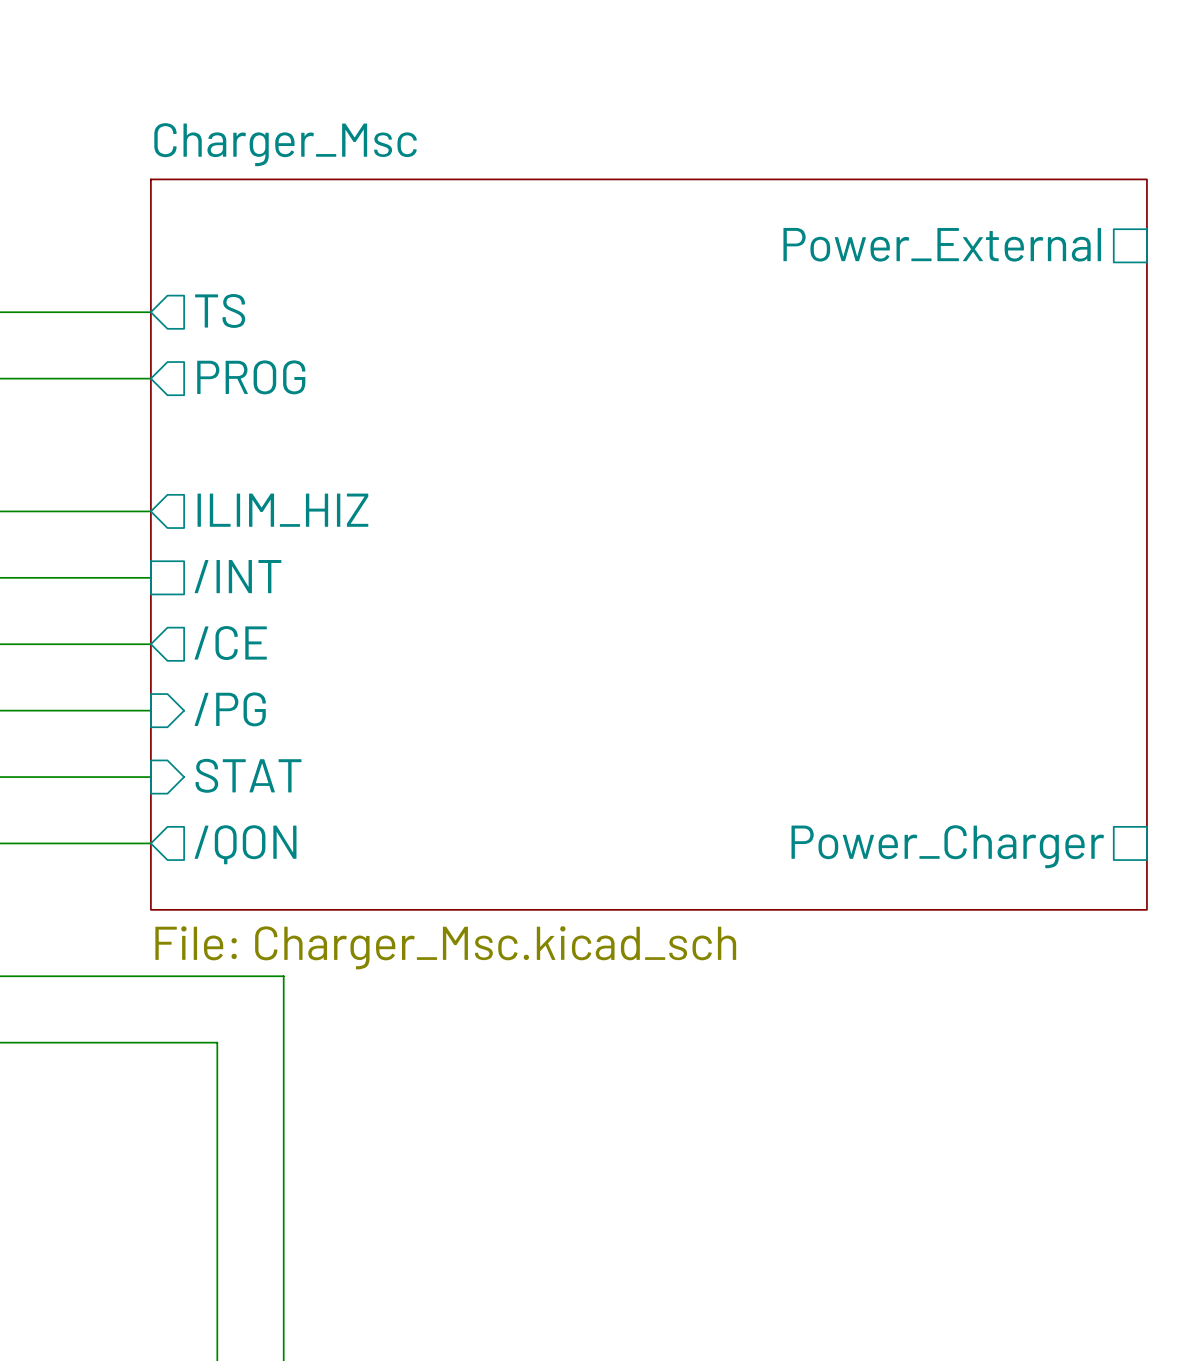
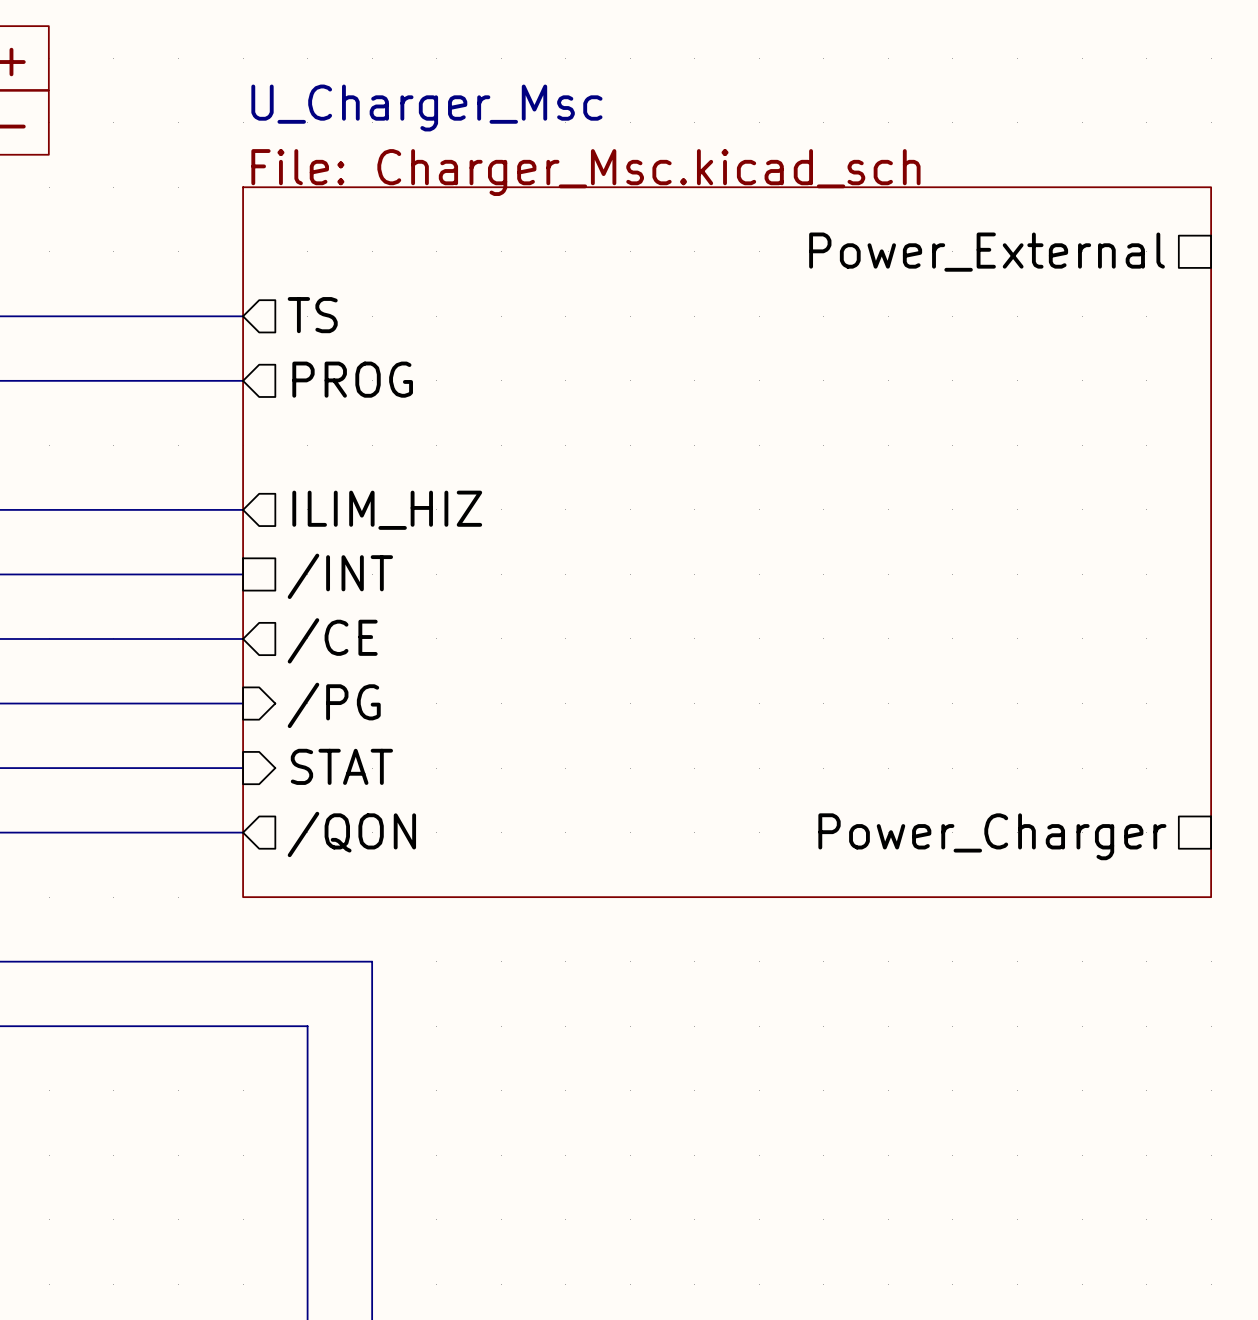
sheet Charger_Msc name: Charger_Msc (285, 144) -> U_Charger_Msc (426, 108)
sheet Charger_Msc value position: File: Charger_Msc.kicad_sch (445, 947) -> File: Charger_Msc.kicad_sch (585, 172)

